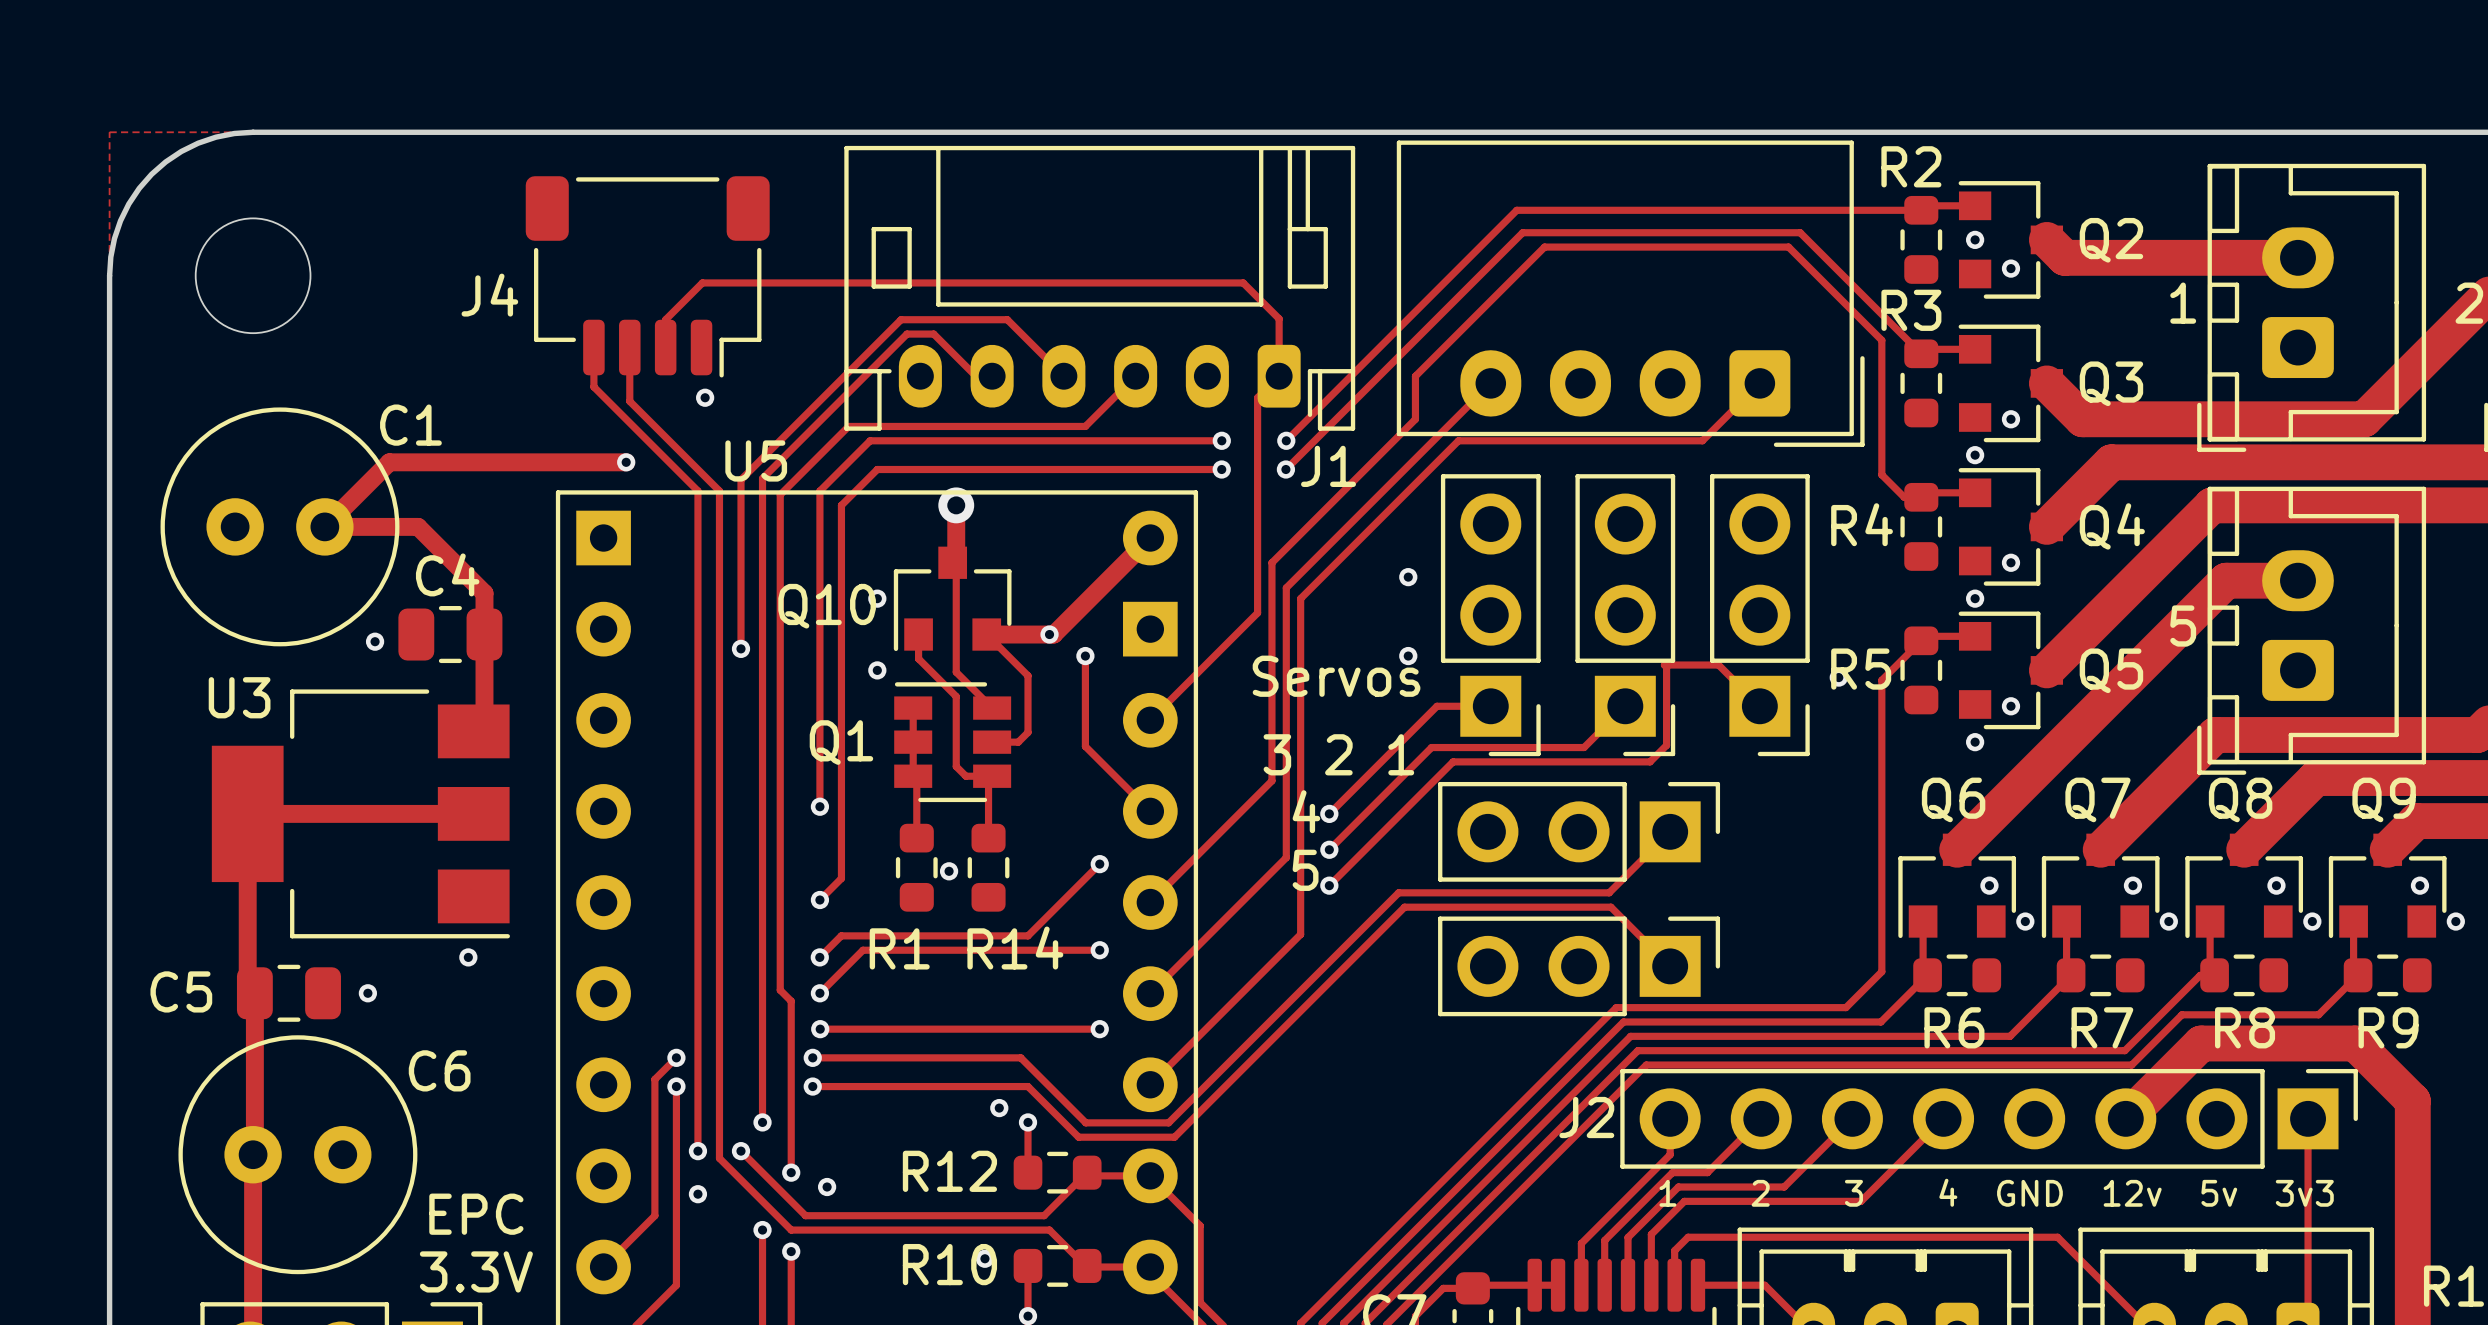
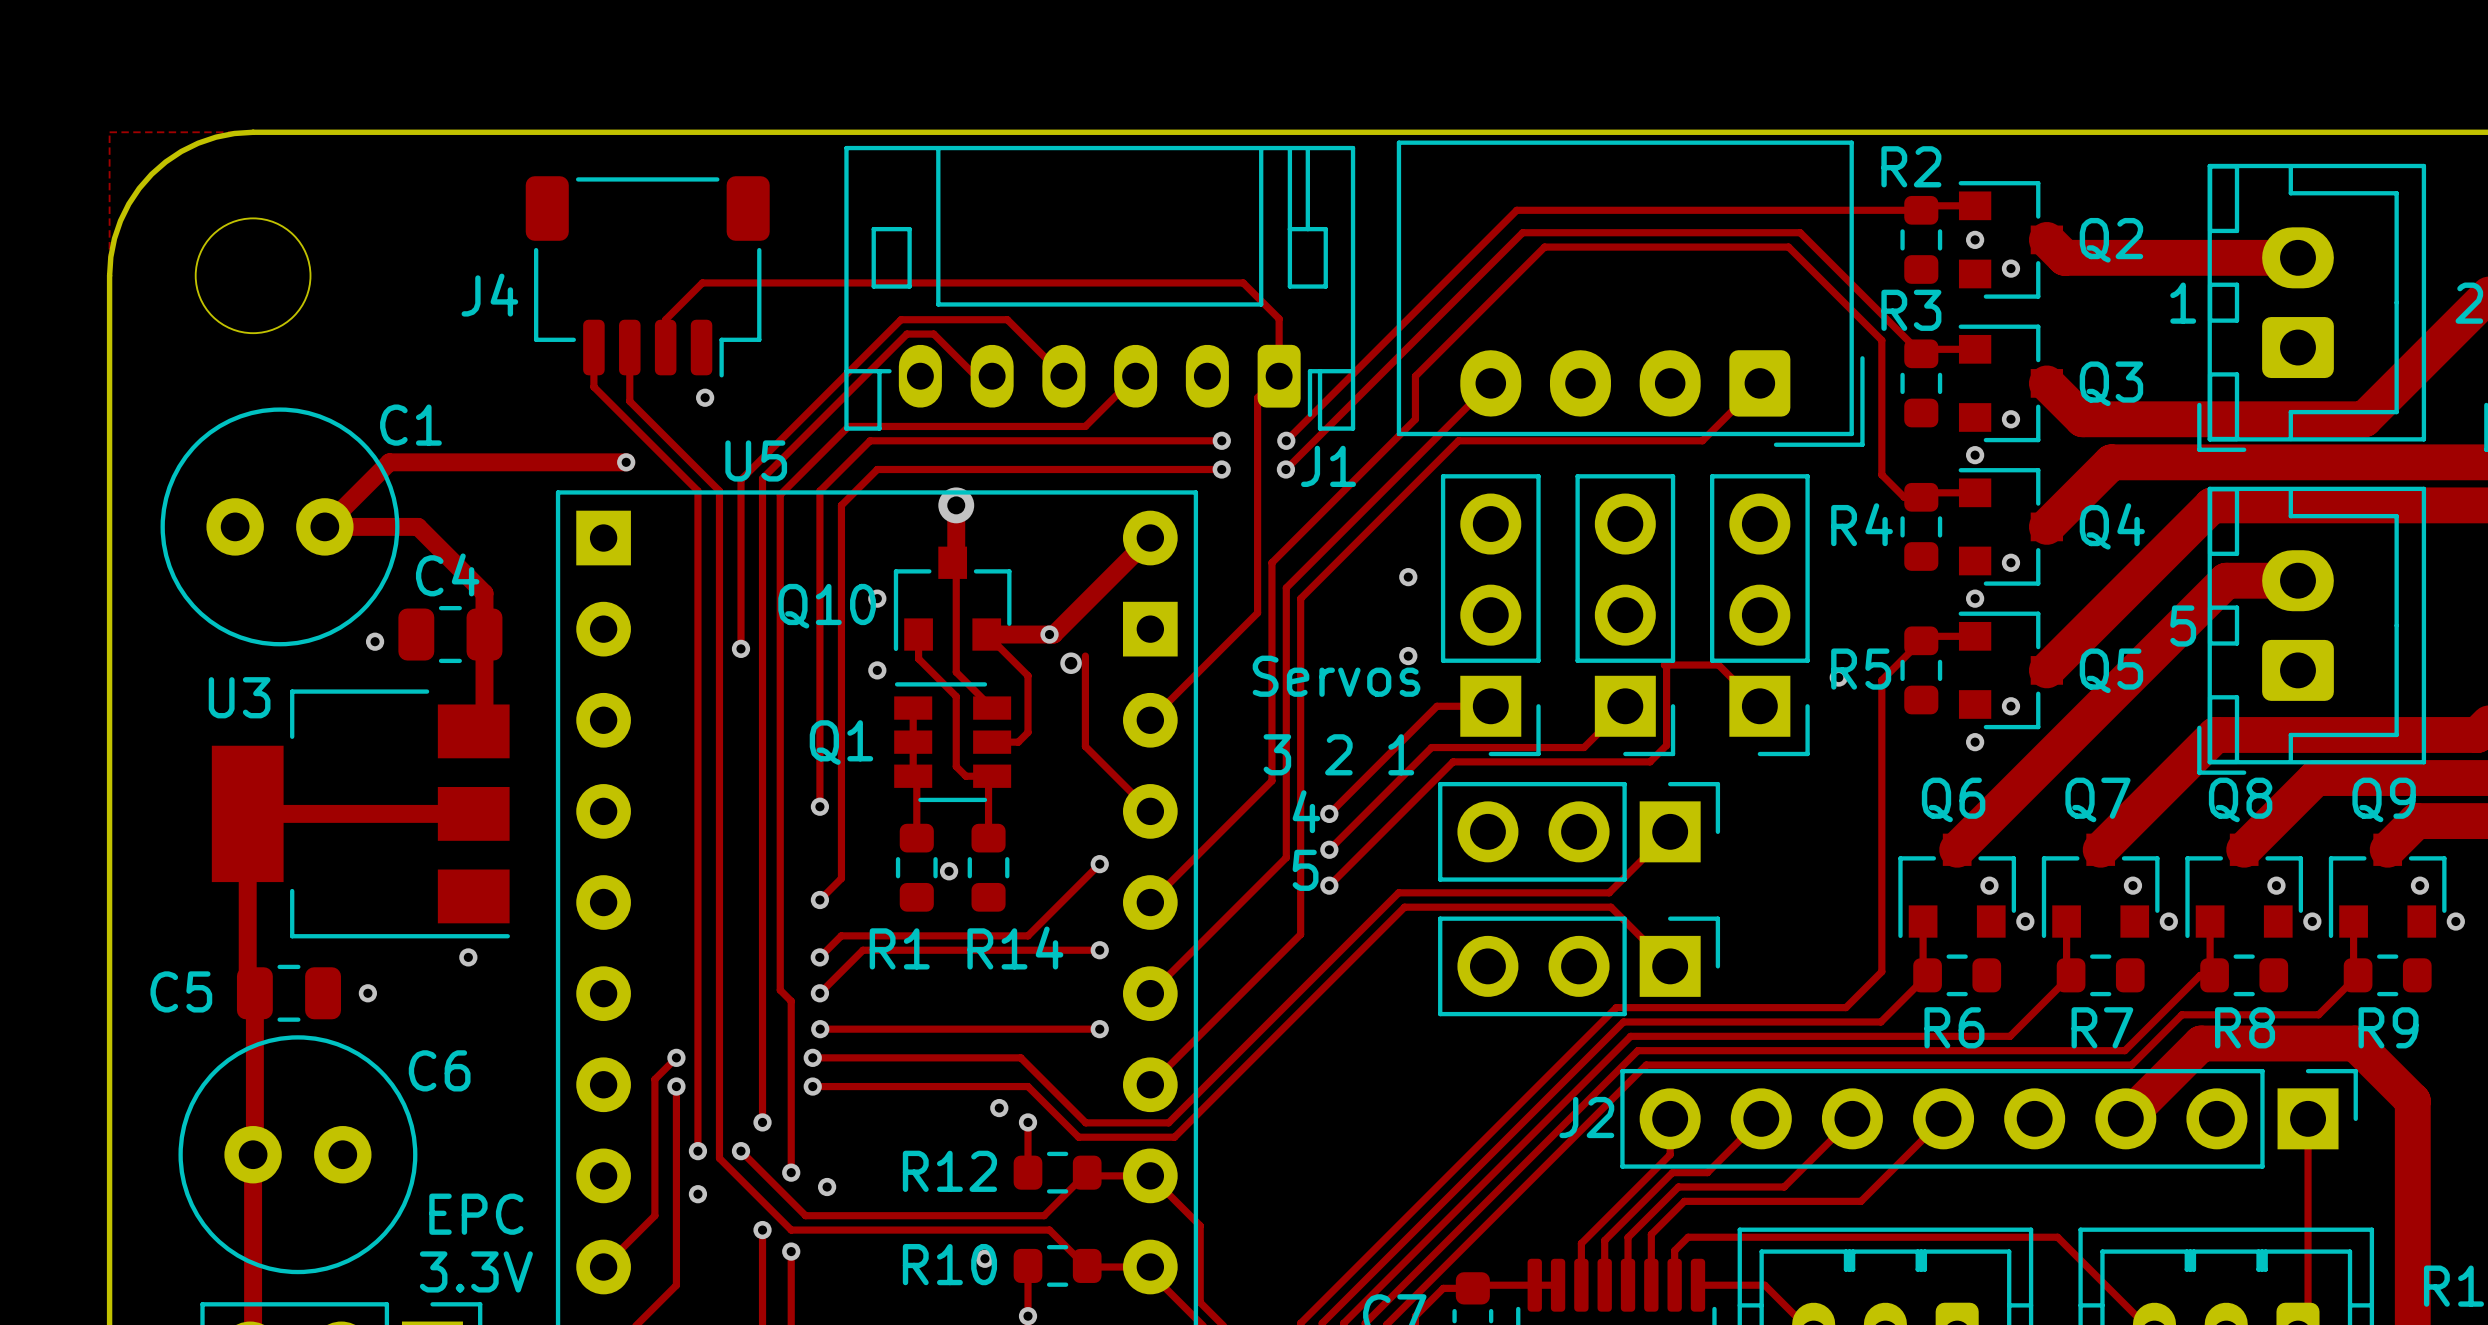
via position: (1085, 656) -> (1071, 663)
text: 1 2 3 4 GND 12v 5v 3v3 (1996, 1192) -> none

